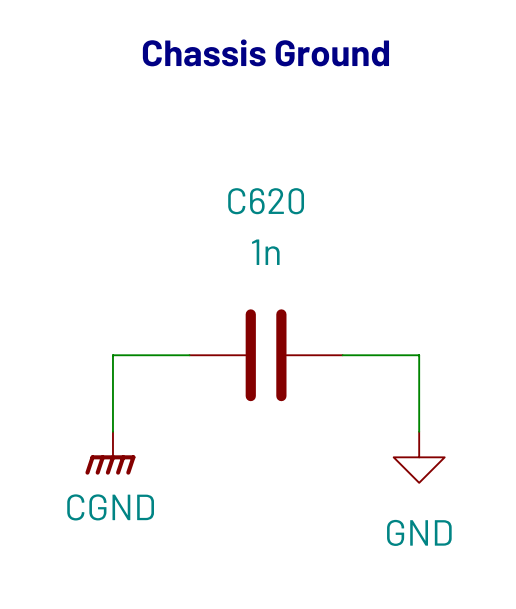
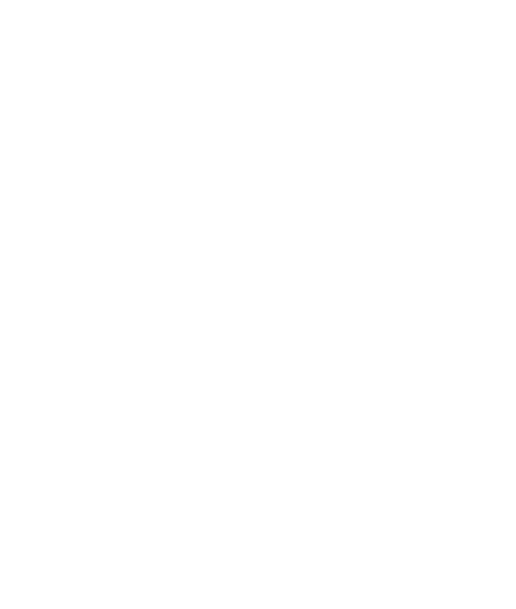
text: Chassis Ground (265, 52) -> none
wire: (189, 355) (112, 355) (112, 431) -> none
C620: 1n (266, 355) -> none
wire: (342, 355) (419, 355) (419, 431) -> none
power symbol: CGND (110, 453) -> none
power symbol: GND (419, 457) -> none

